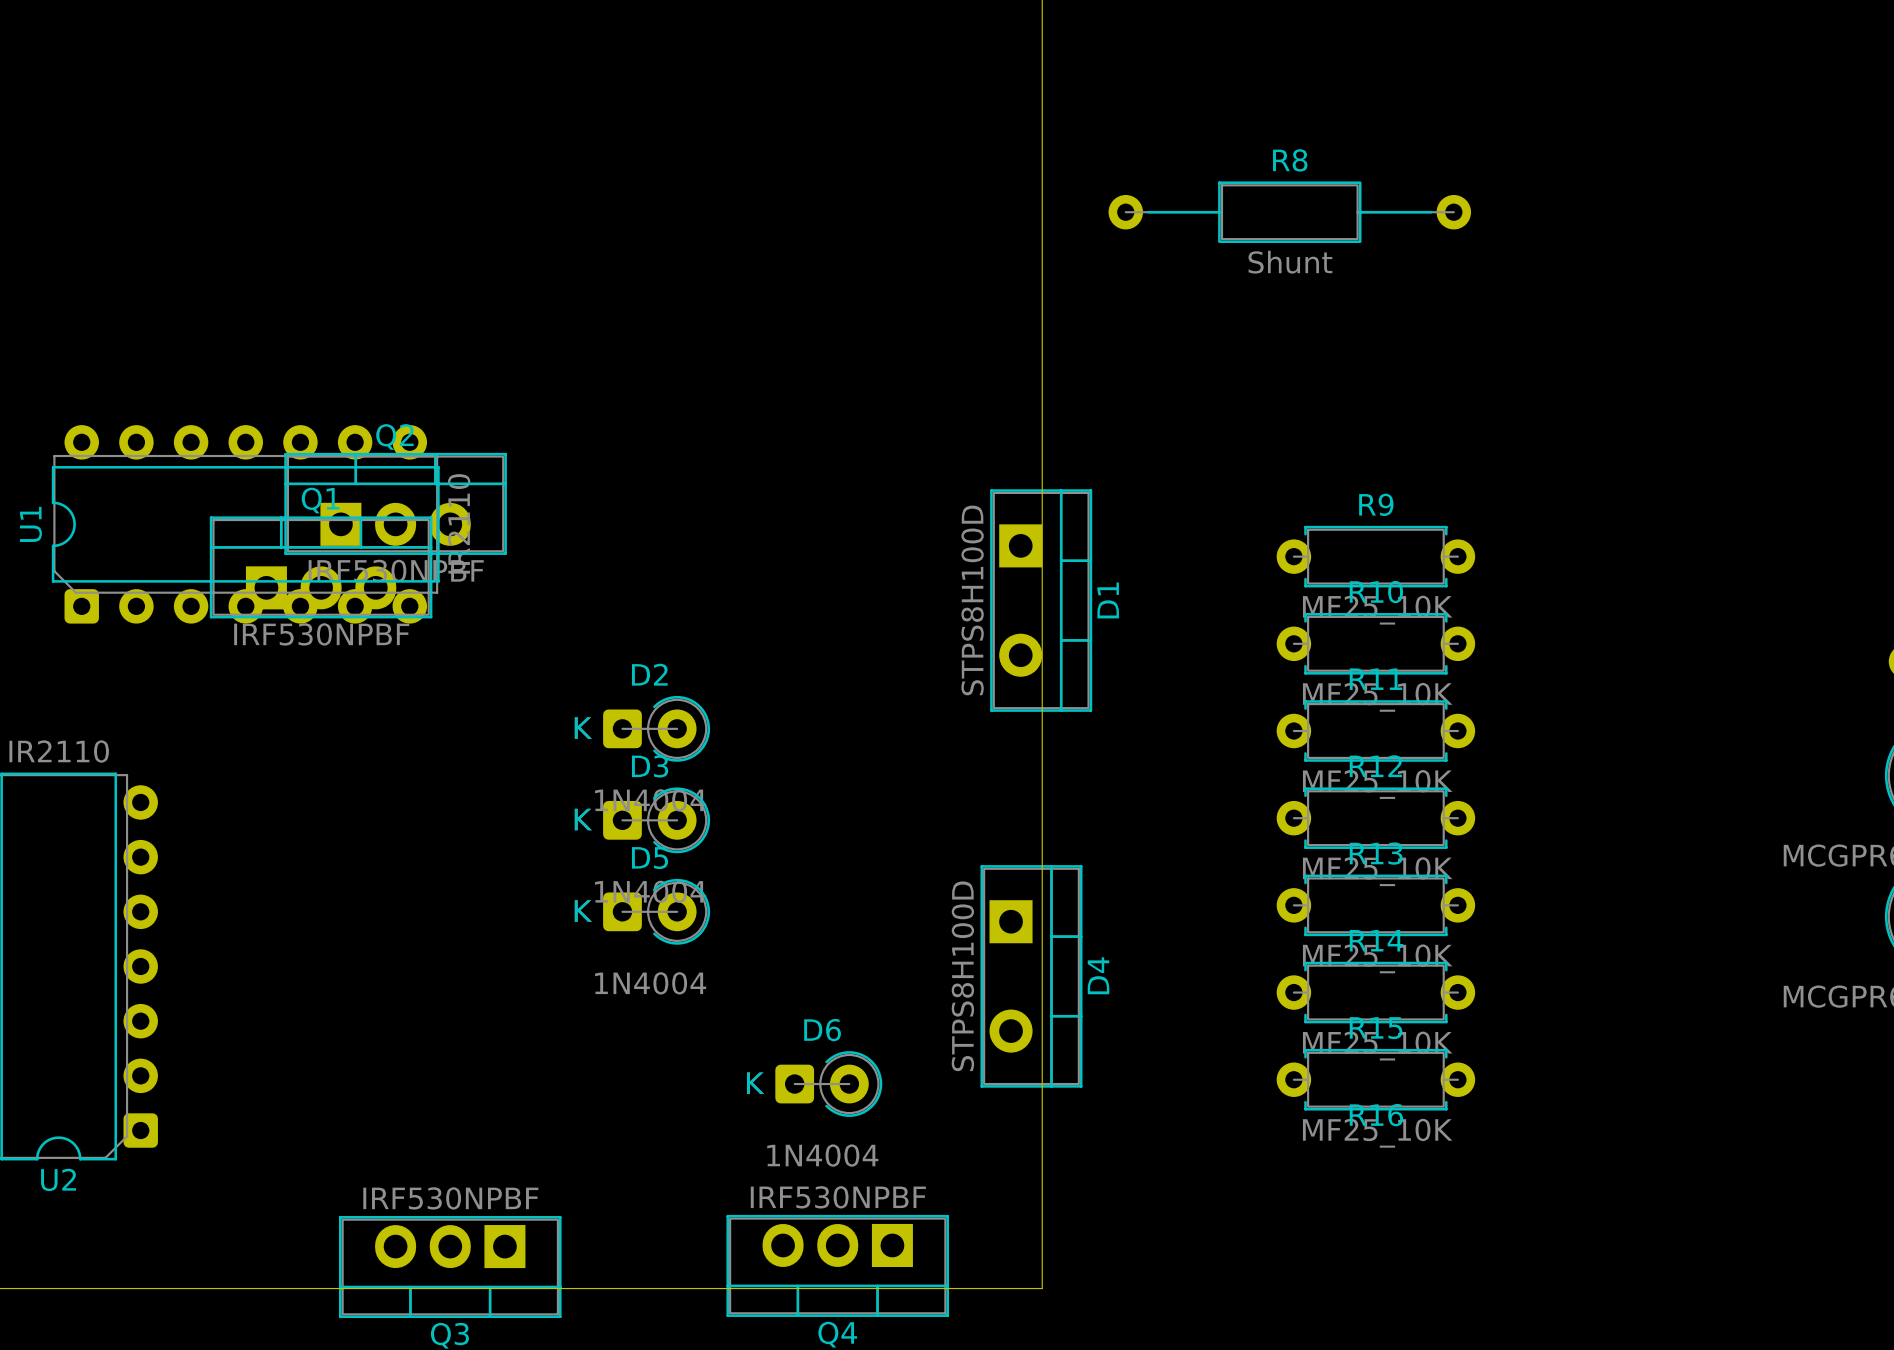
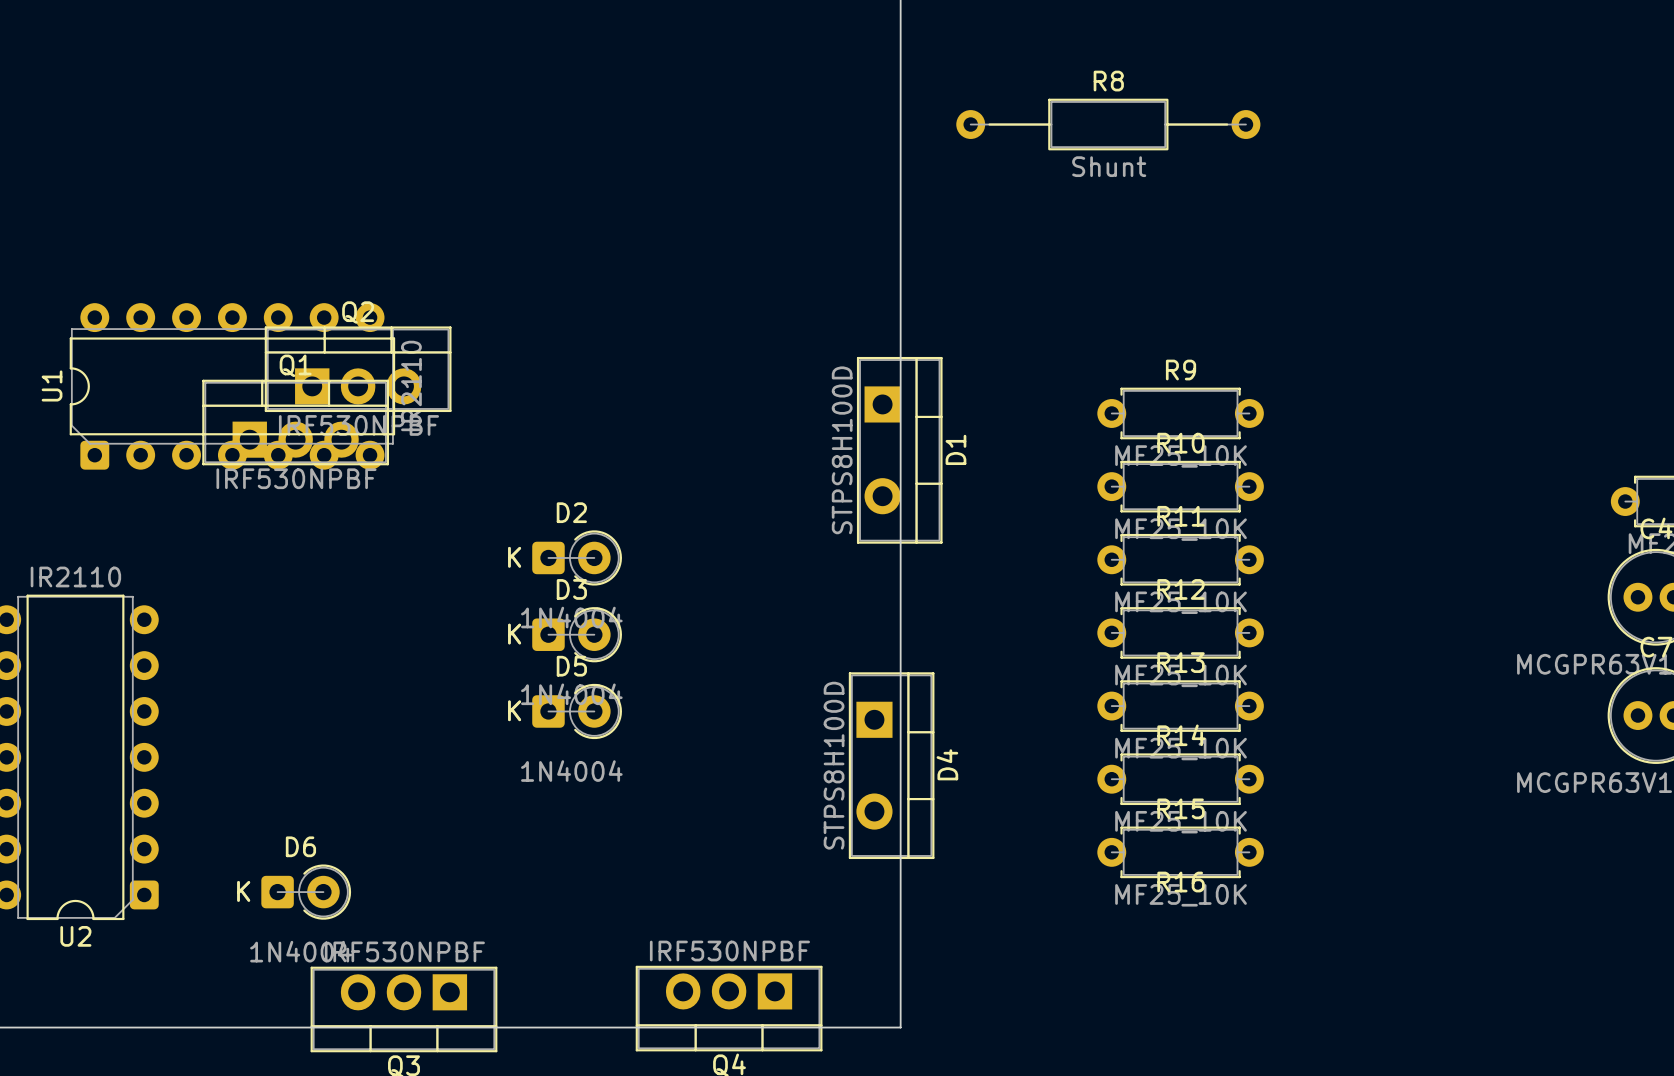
D6 position: (828, 1084) -> (306, 892)

